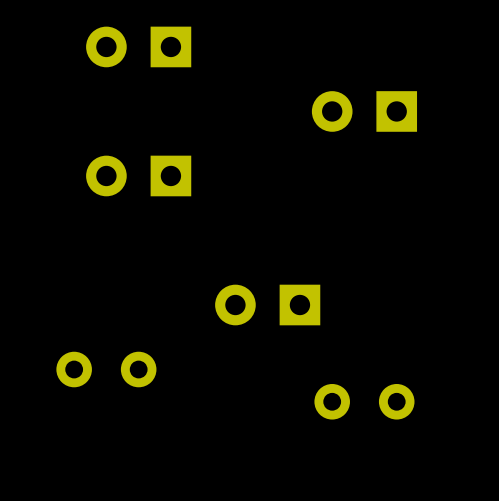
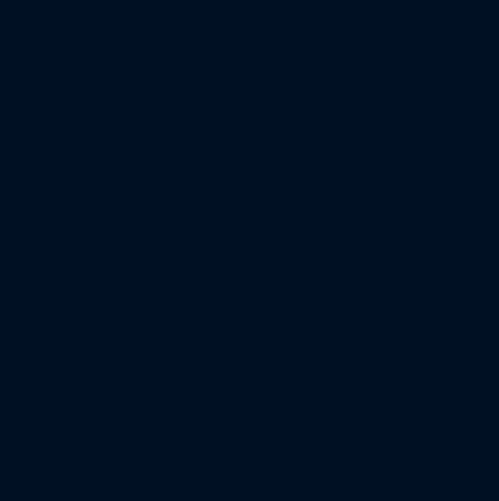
part: (138, 46) -> none
part: (364, 111) -> none
part: (138, 175) -> none
part: (267, 305) -> none
part: (106, 369) -> none
part: (364, 401) -> none

